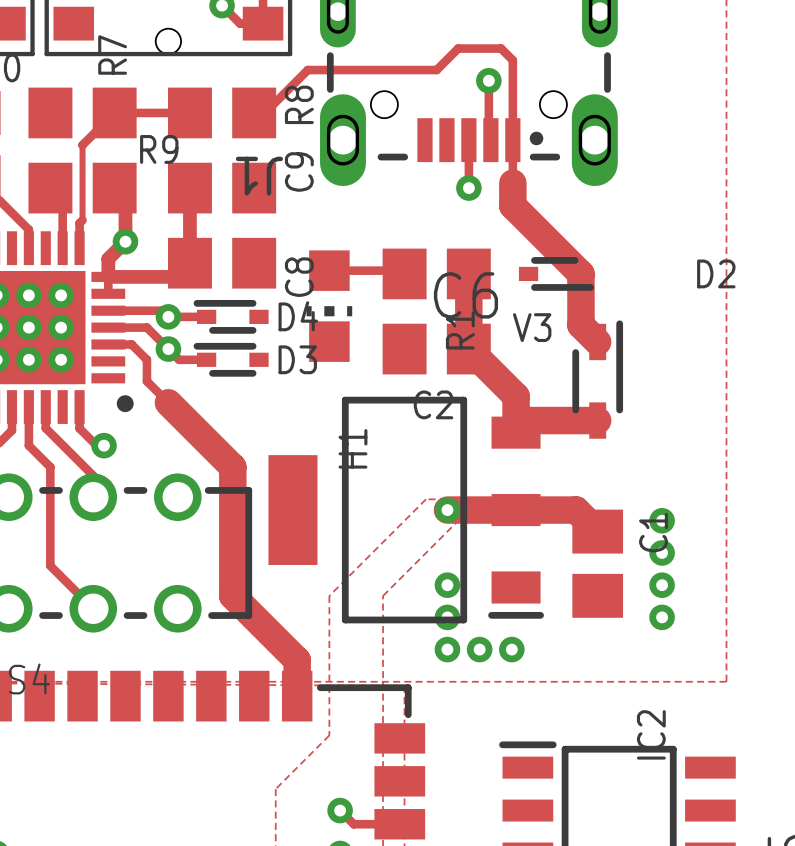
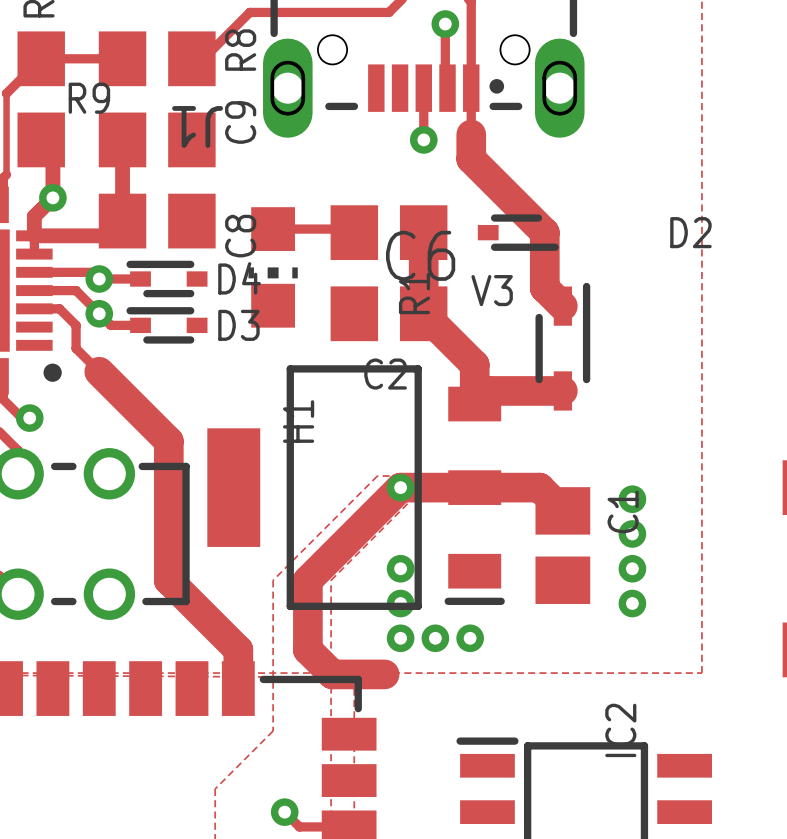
track: none -> (400, 487) (307, 580) (307, 649) (332, 674) (384, 674)

